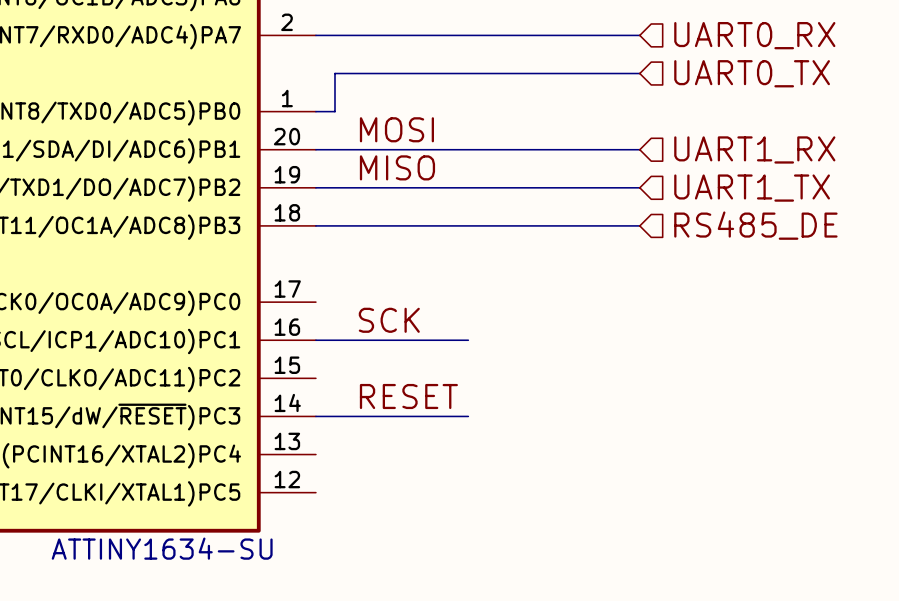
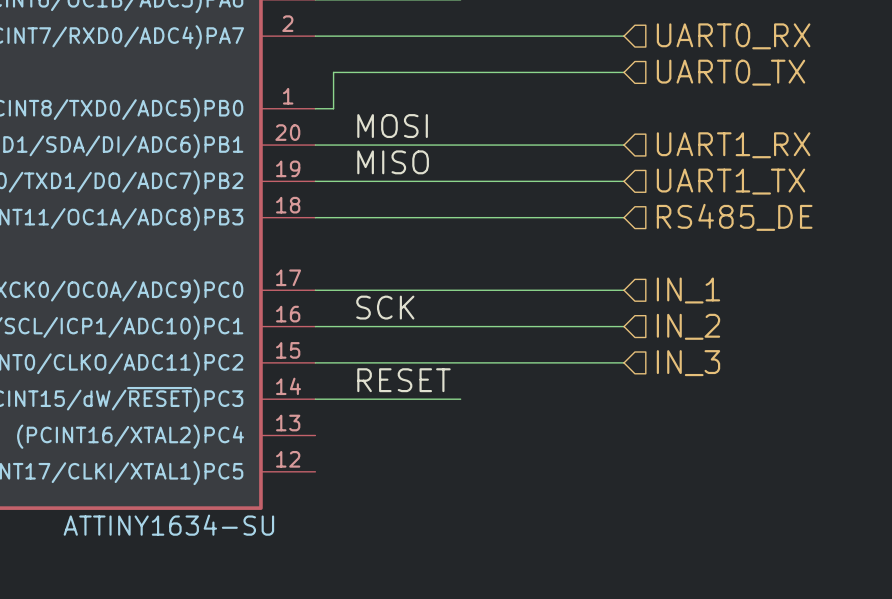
wire: none -> (315, 290) (624, 290)
hierarchical label: none -> IN_1 (688, 290)
wire: none -> (460, 326) (624, 326)
hierarchical label: none -> IN_2 (688, 326)
wire: none -> (315, 362) (624, 362)
hierarchical label: none -> IN_3 (688, 363)

